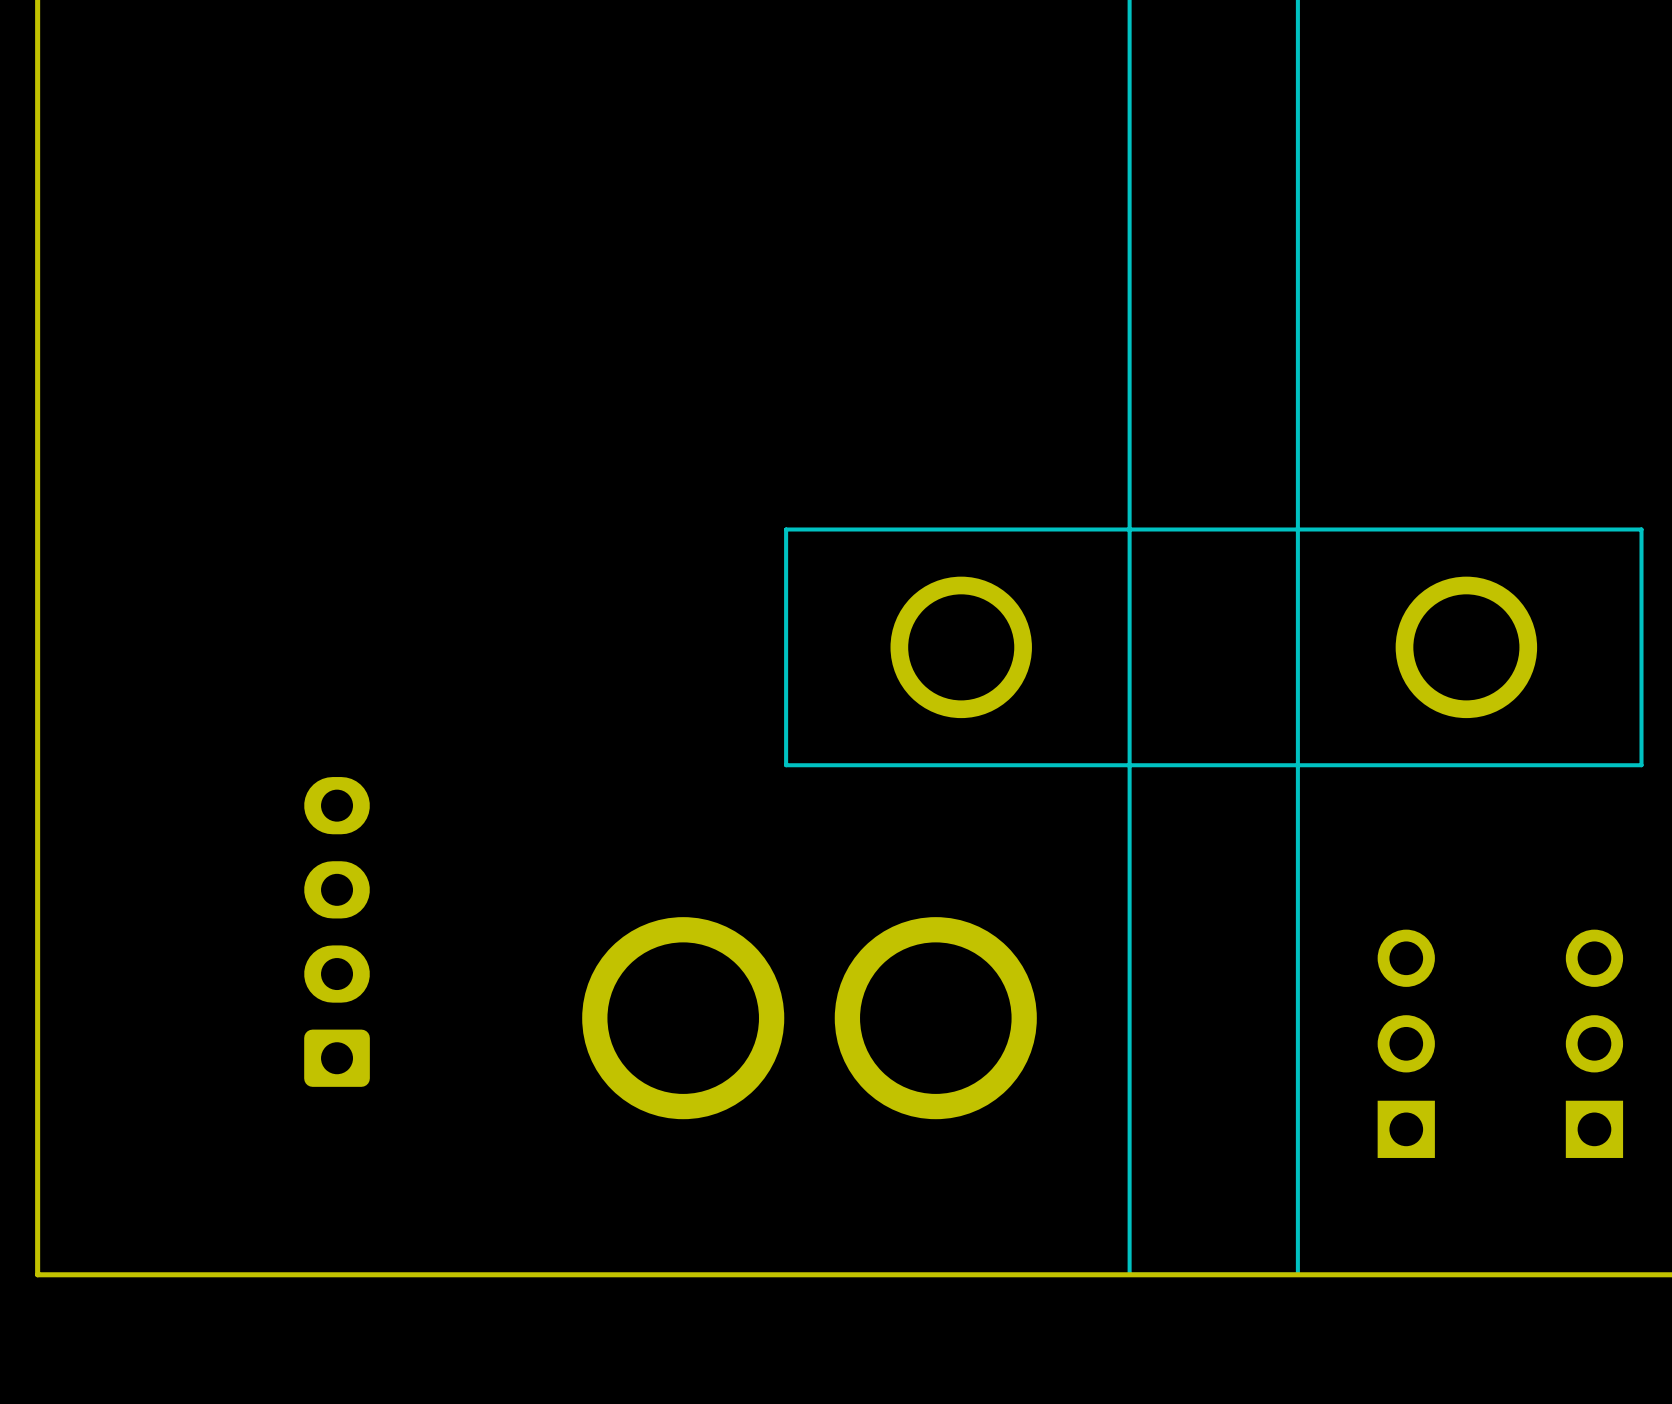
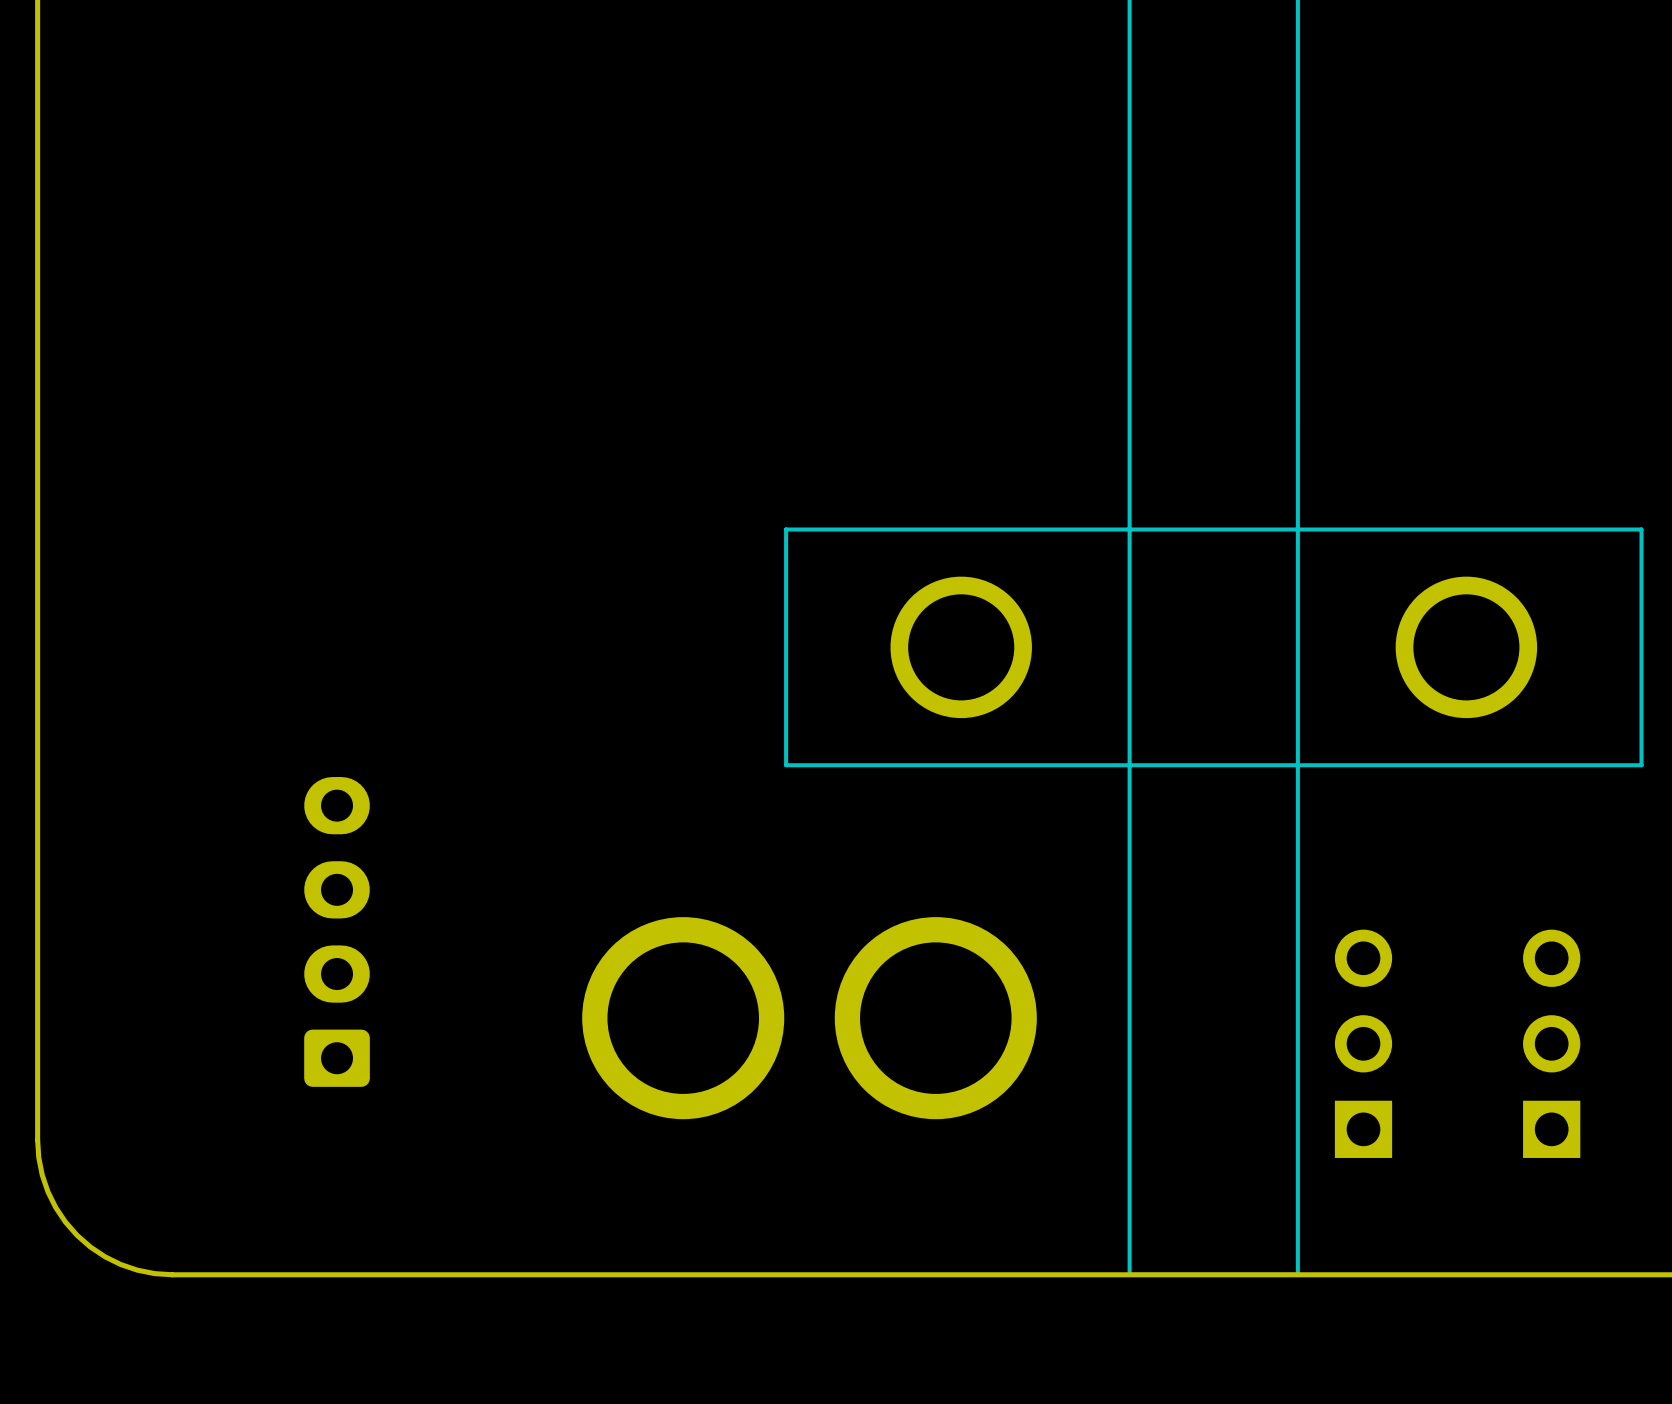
part position: (1406, 1043) -> (1363, 1043)
part position: (1594, 1043) -> (1551, 1043)
board edge: (37, 1140) (37, 1274) (172, 1274) -> (37, 1140) (42, 1174) (47, 1191) (65, 1222) (77, 1235) (90, 1246) (120, 1264) (137, 1270) (172, 1274)

